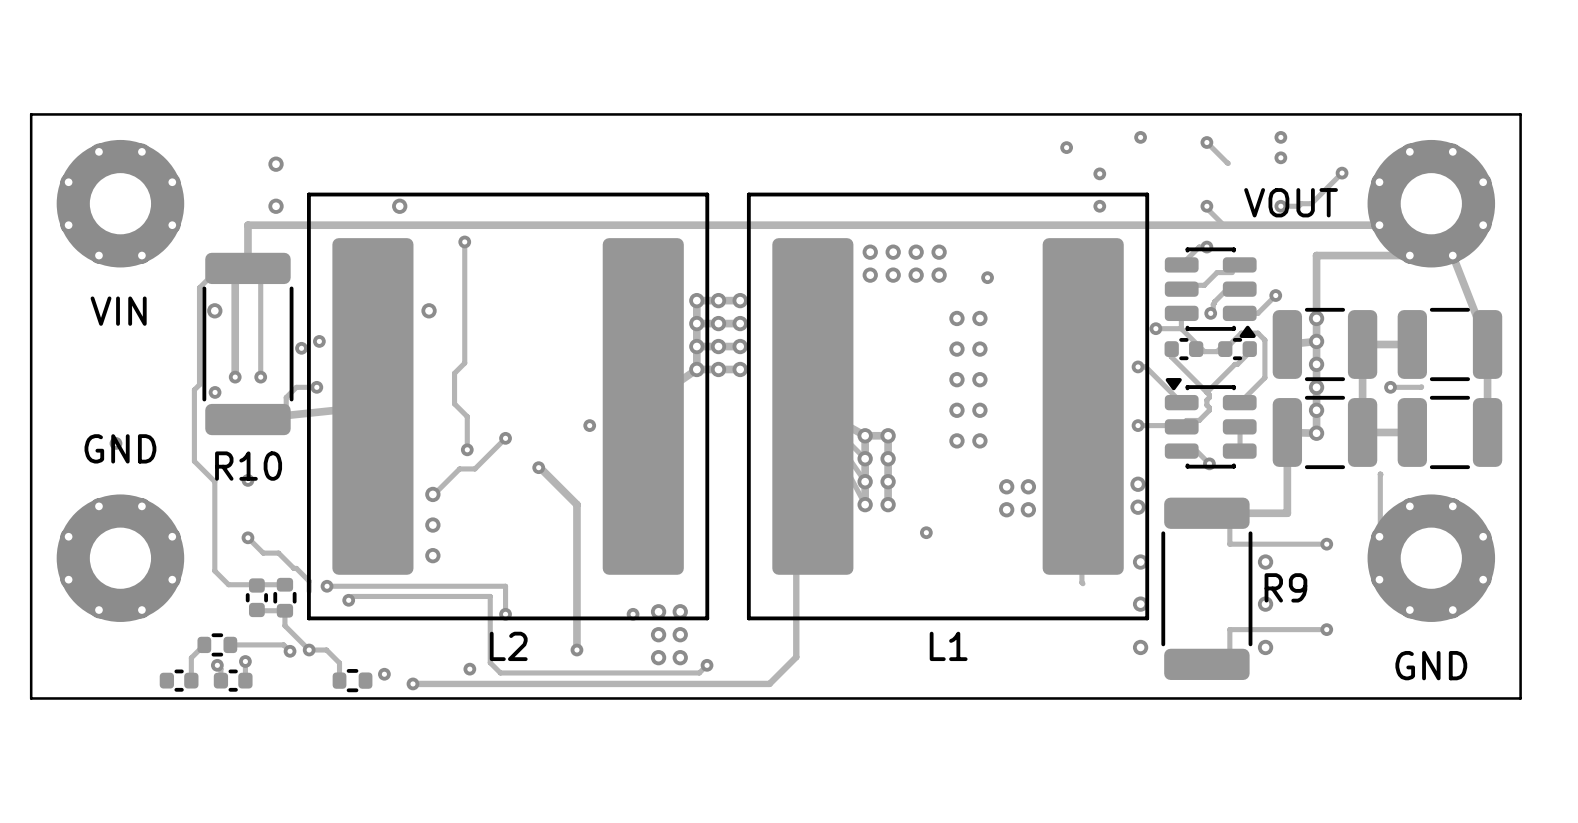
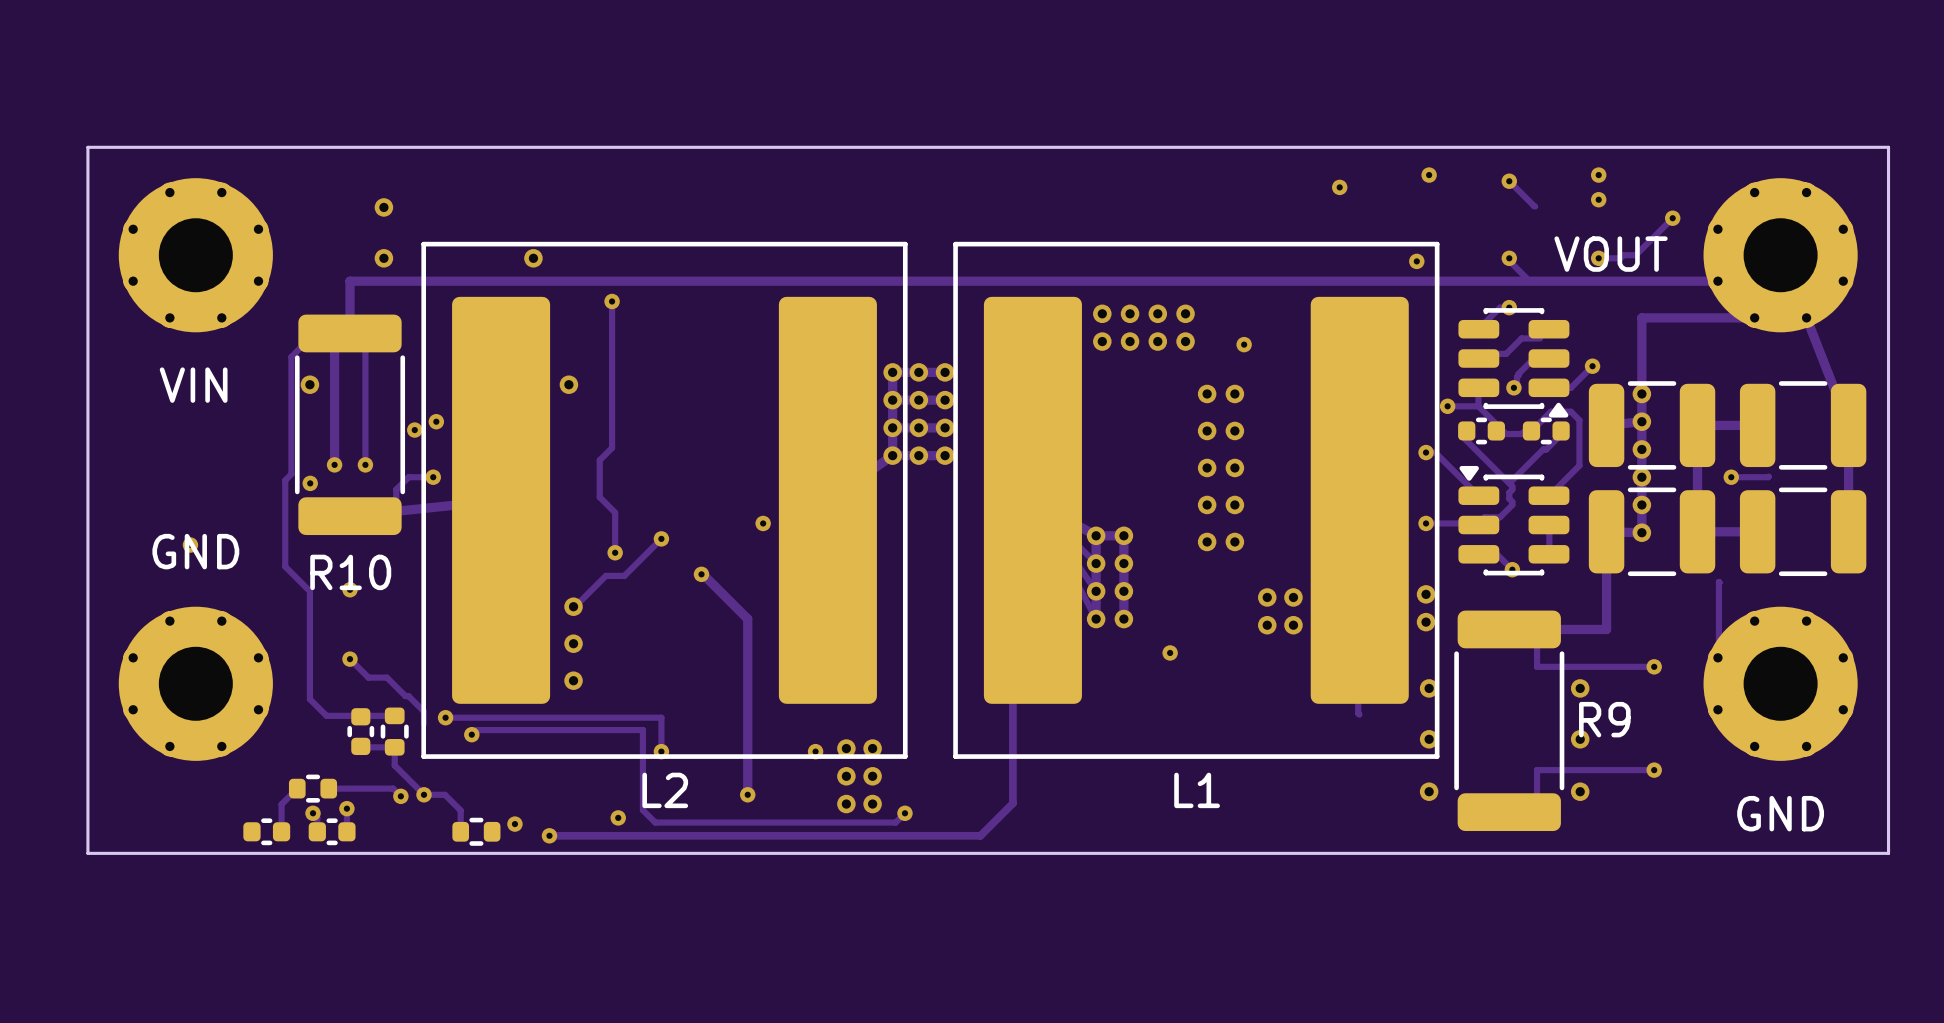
via: (1099, 173) -> none
via: (1099, 206) -> none
via: none -> (1416, 261)

